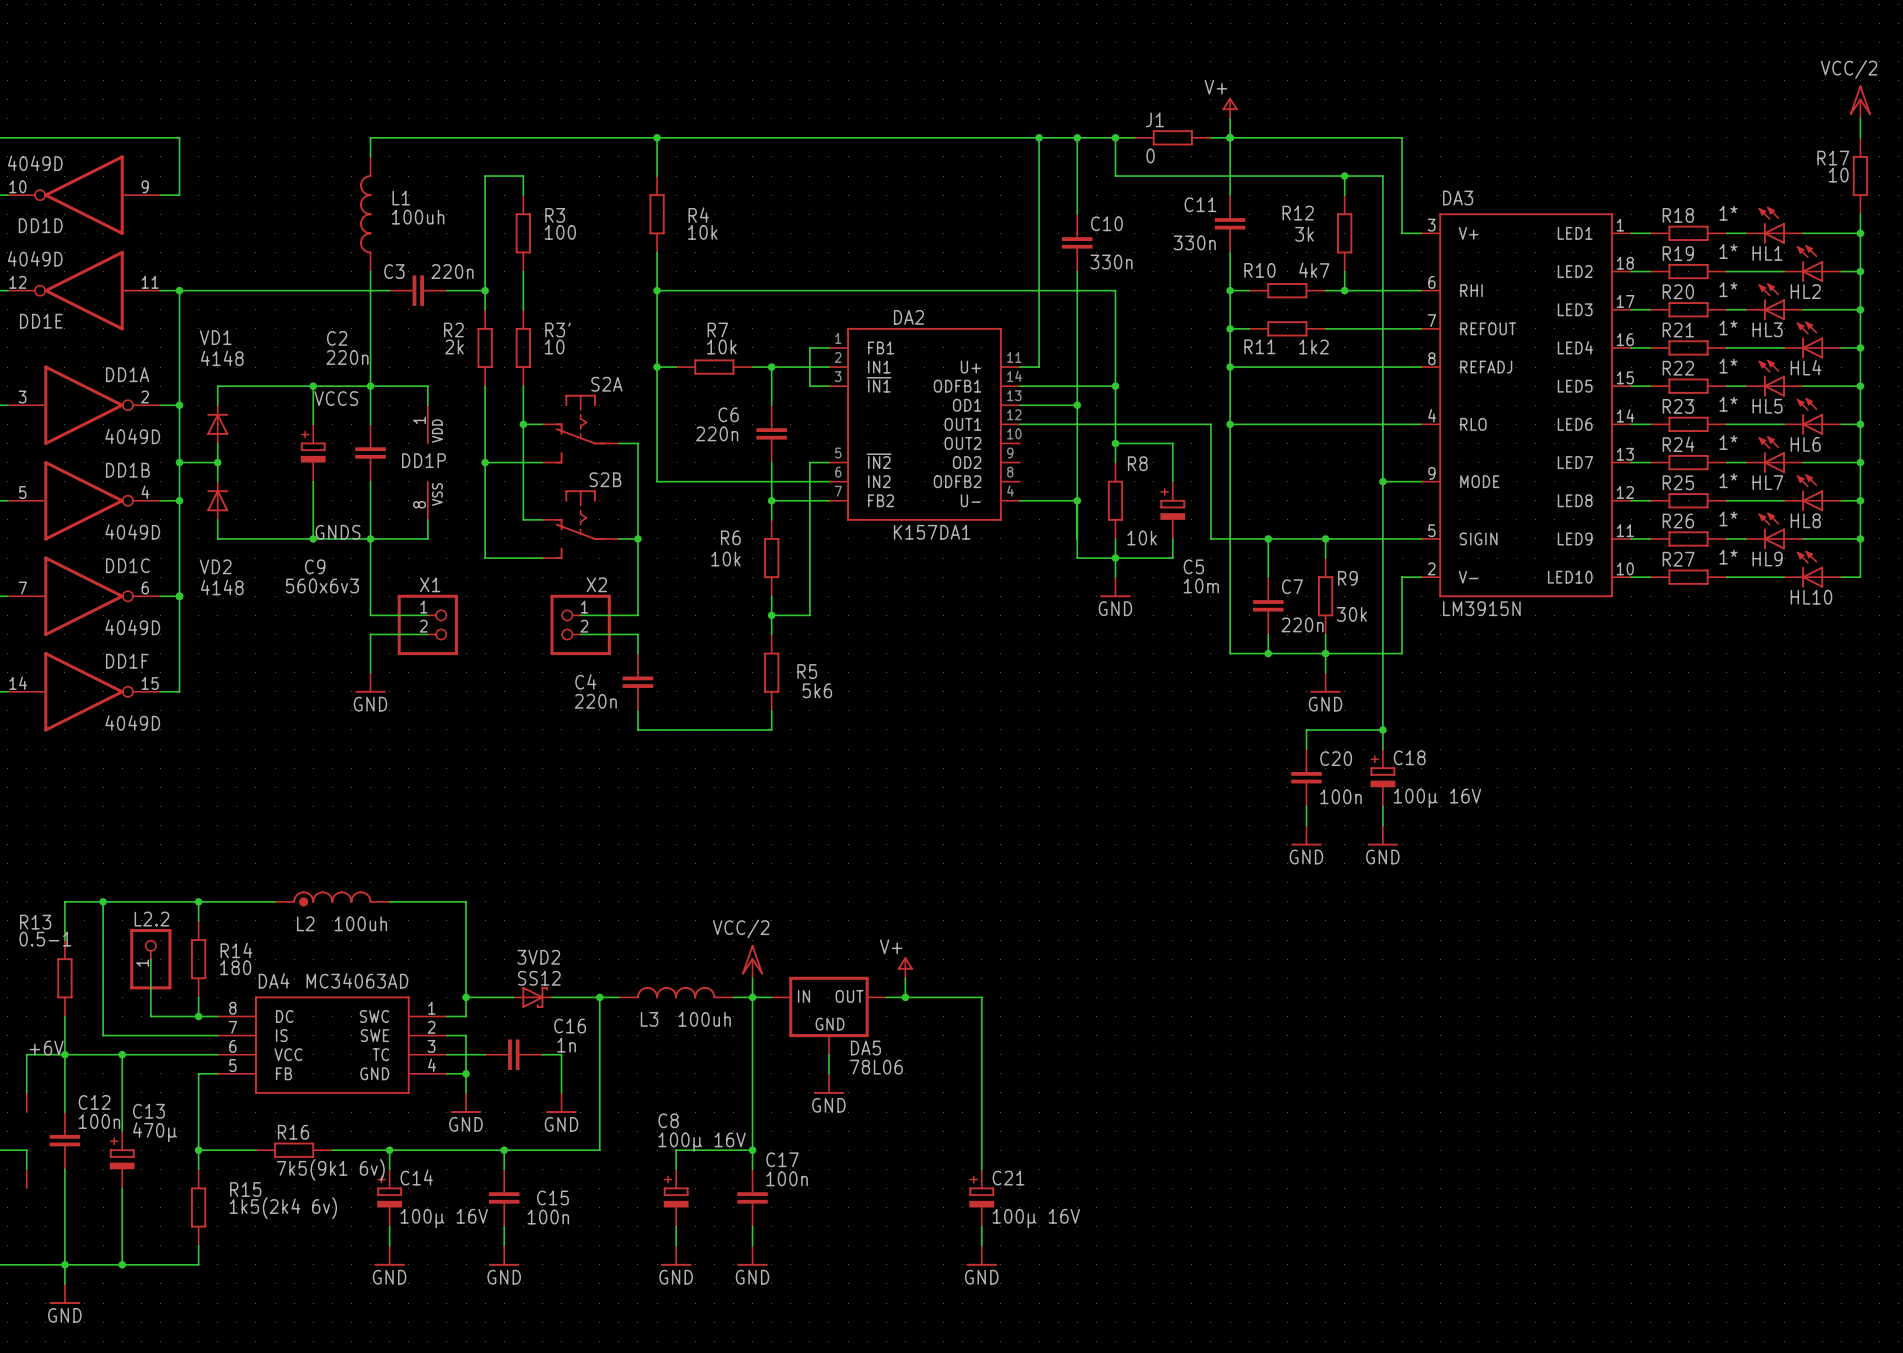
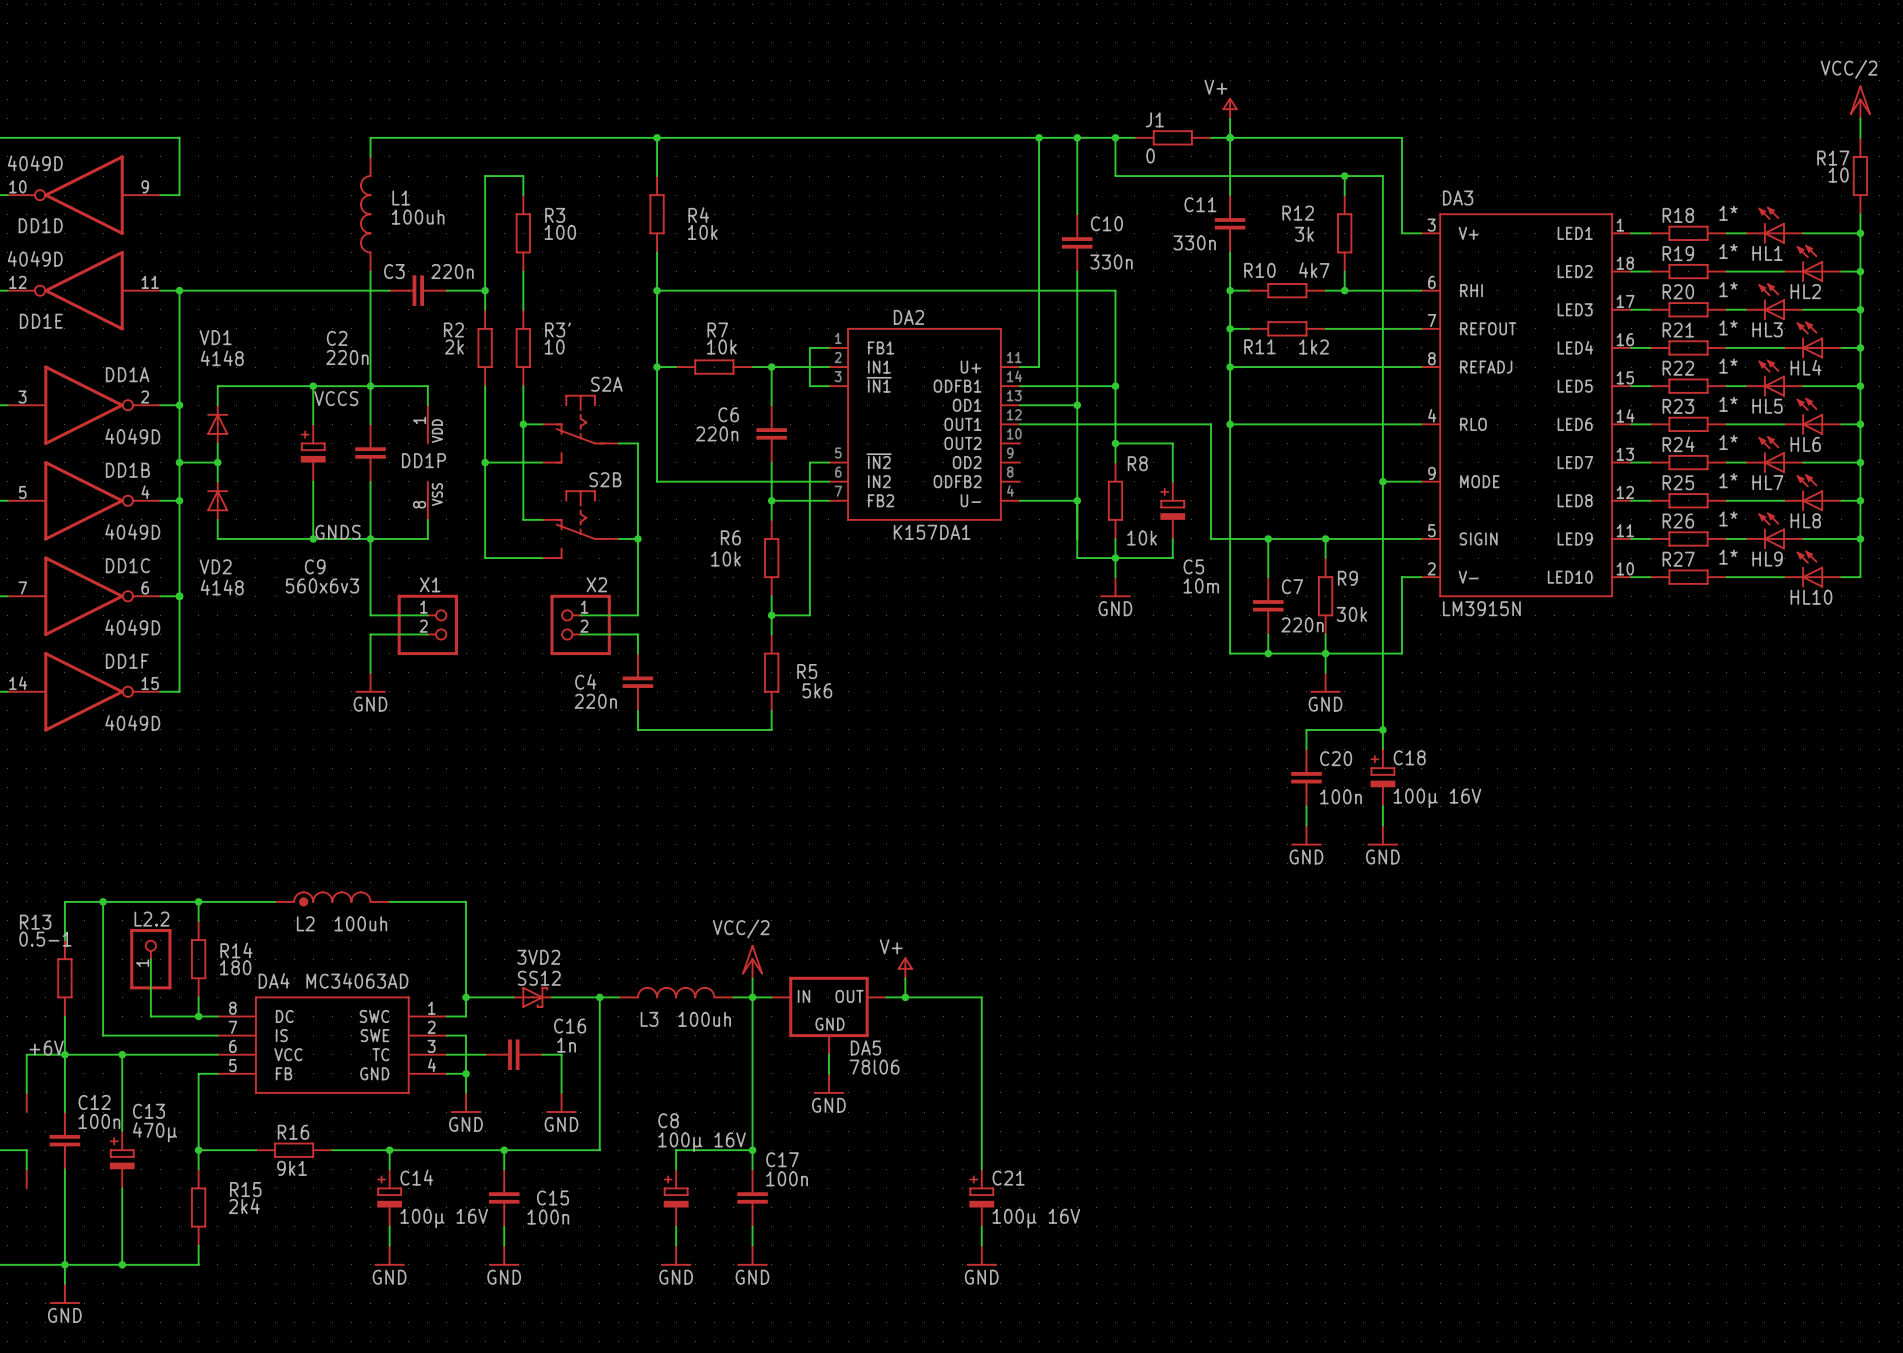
DA5 value: 78L06 (876, 1067) -> 78l06 (874, 1067)
R16 value: 7k5(9k1 6v) (330, 1169) -> 9k1 (292, 1168)
R15 value: 1k5(2k4 6v) (283, 1208) -> 2k4 (244, 1206)

